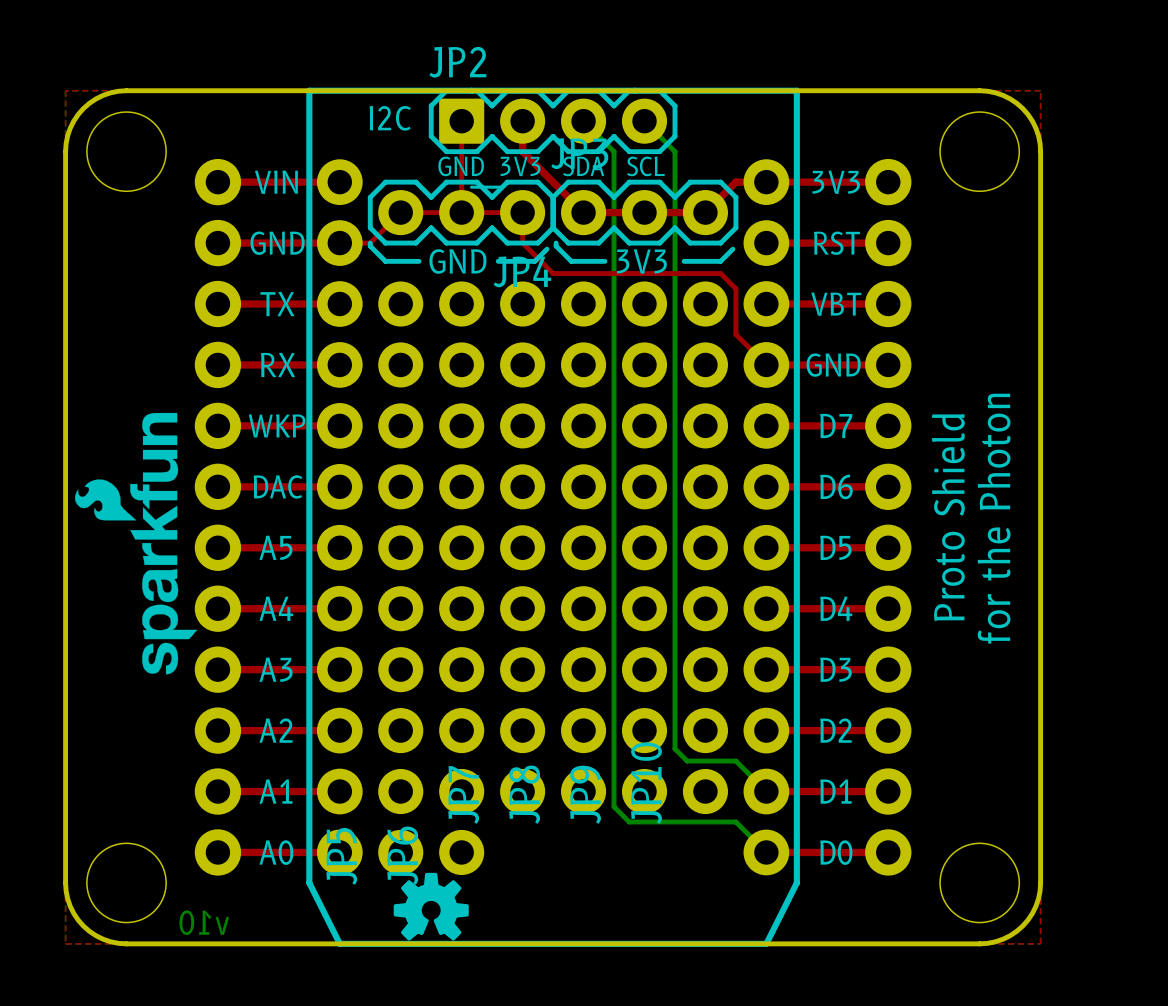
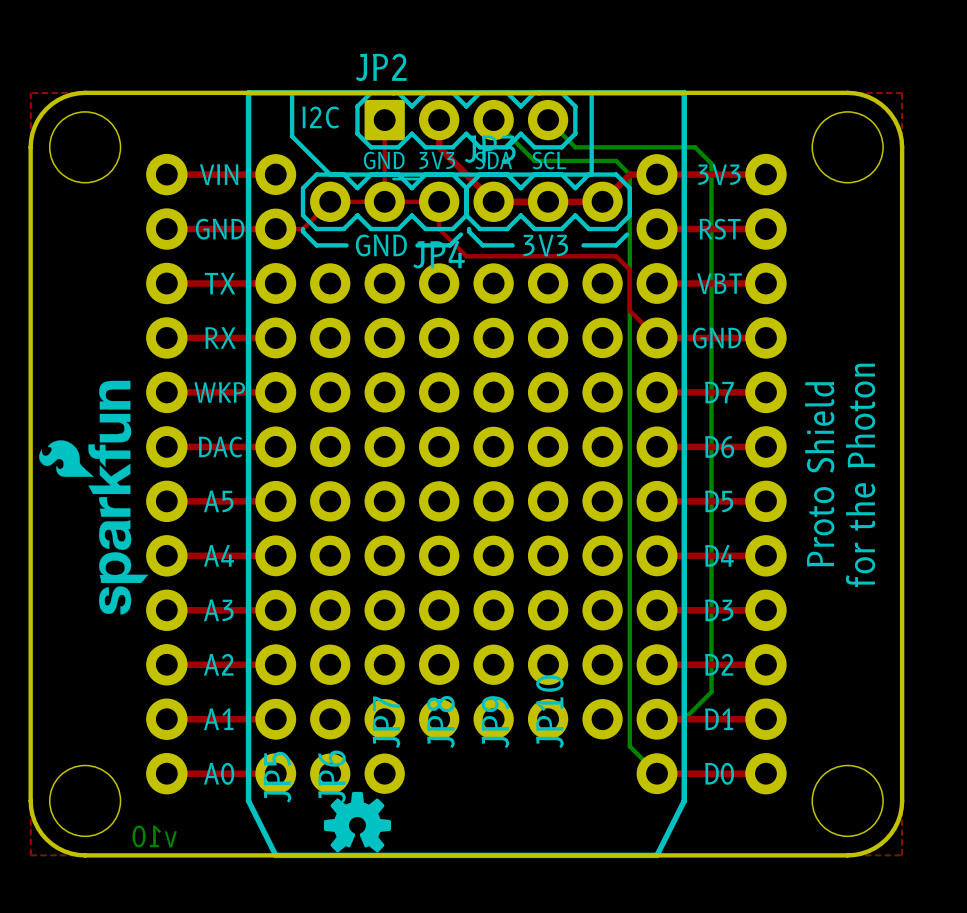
line: none -> (292, 92) (292, 136) (330, 174) (591, 174) (591, 92) (588, 92)
bottom track: (614, 151) (614, 806) (629, 821) (735, 821) -> (520, 147) (534, 160) (616, 160) (629, 174) (629, 746)
bottom track: (674, 151) (674, 748) (687, 761) (735, 761) (766, 791) -> (575, 147) (695, 147) (711, 163) (711, 691) (684, 719) (657, 719)

